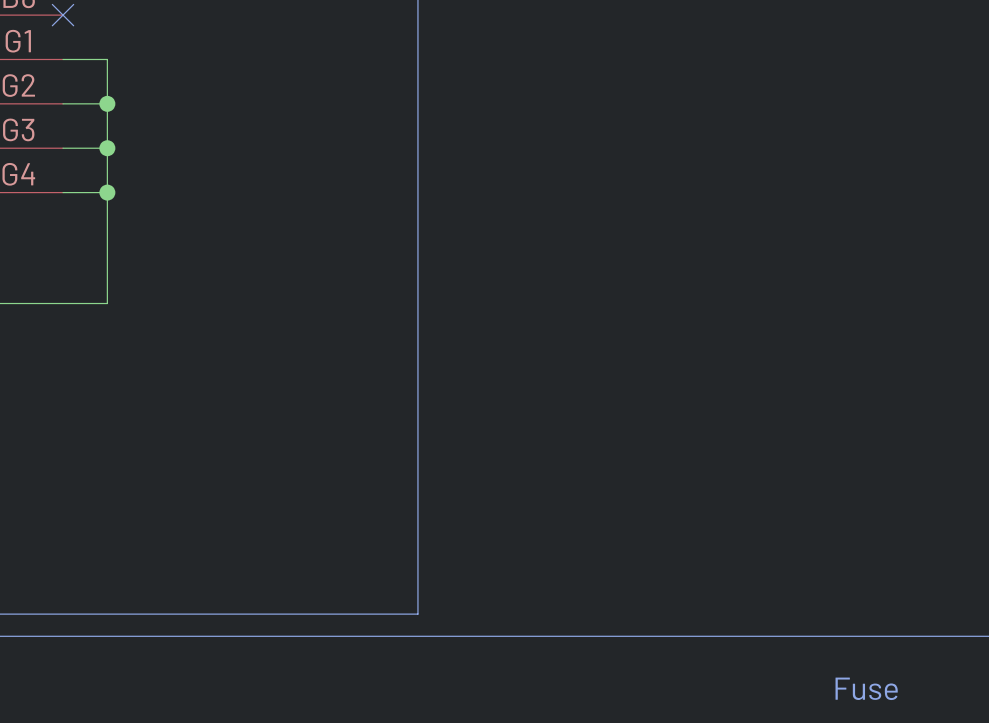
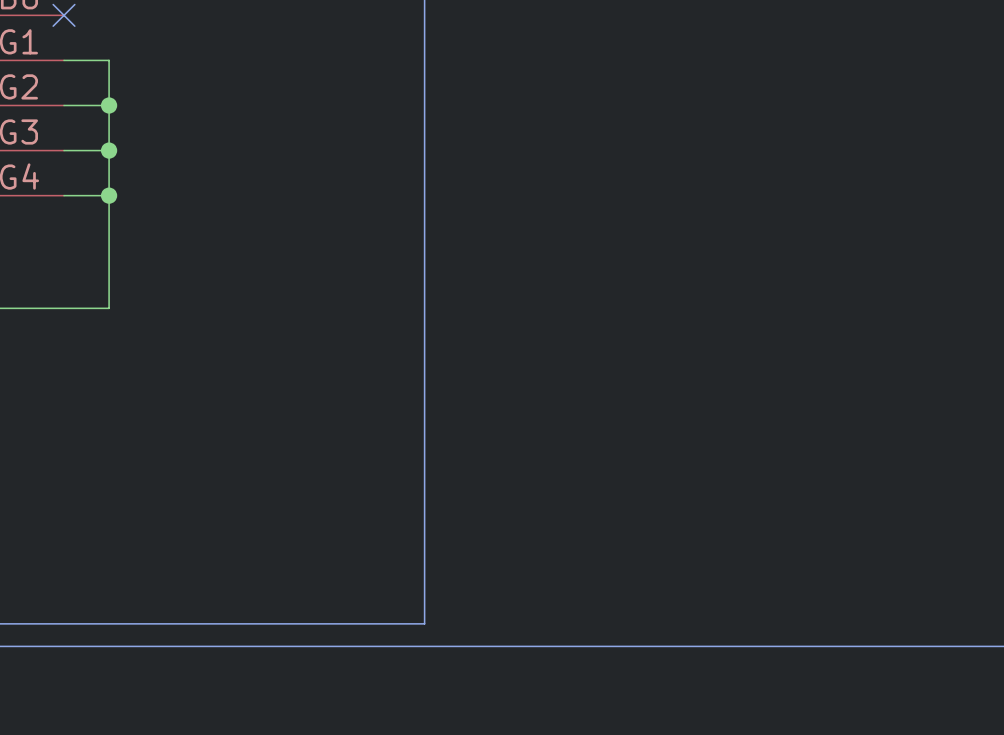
text: Fuse (866, 688) -> none

